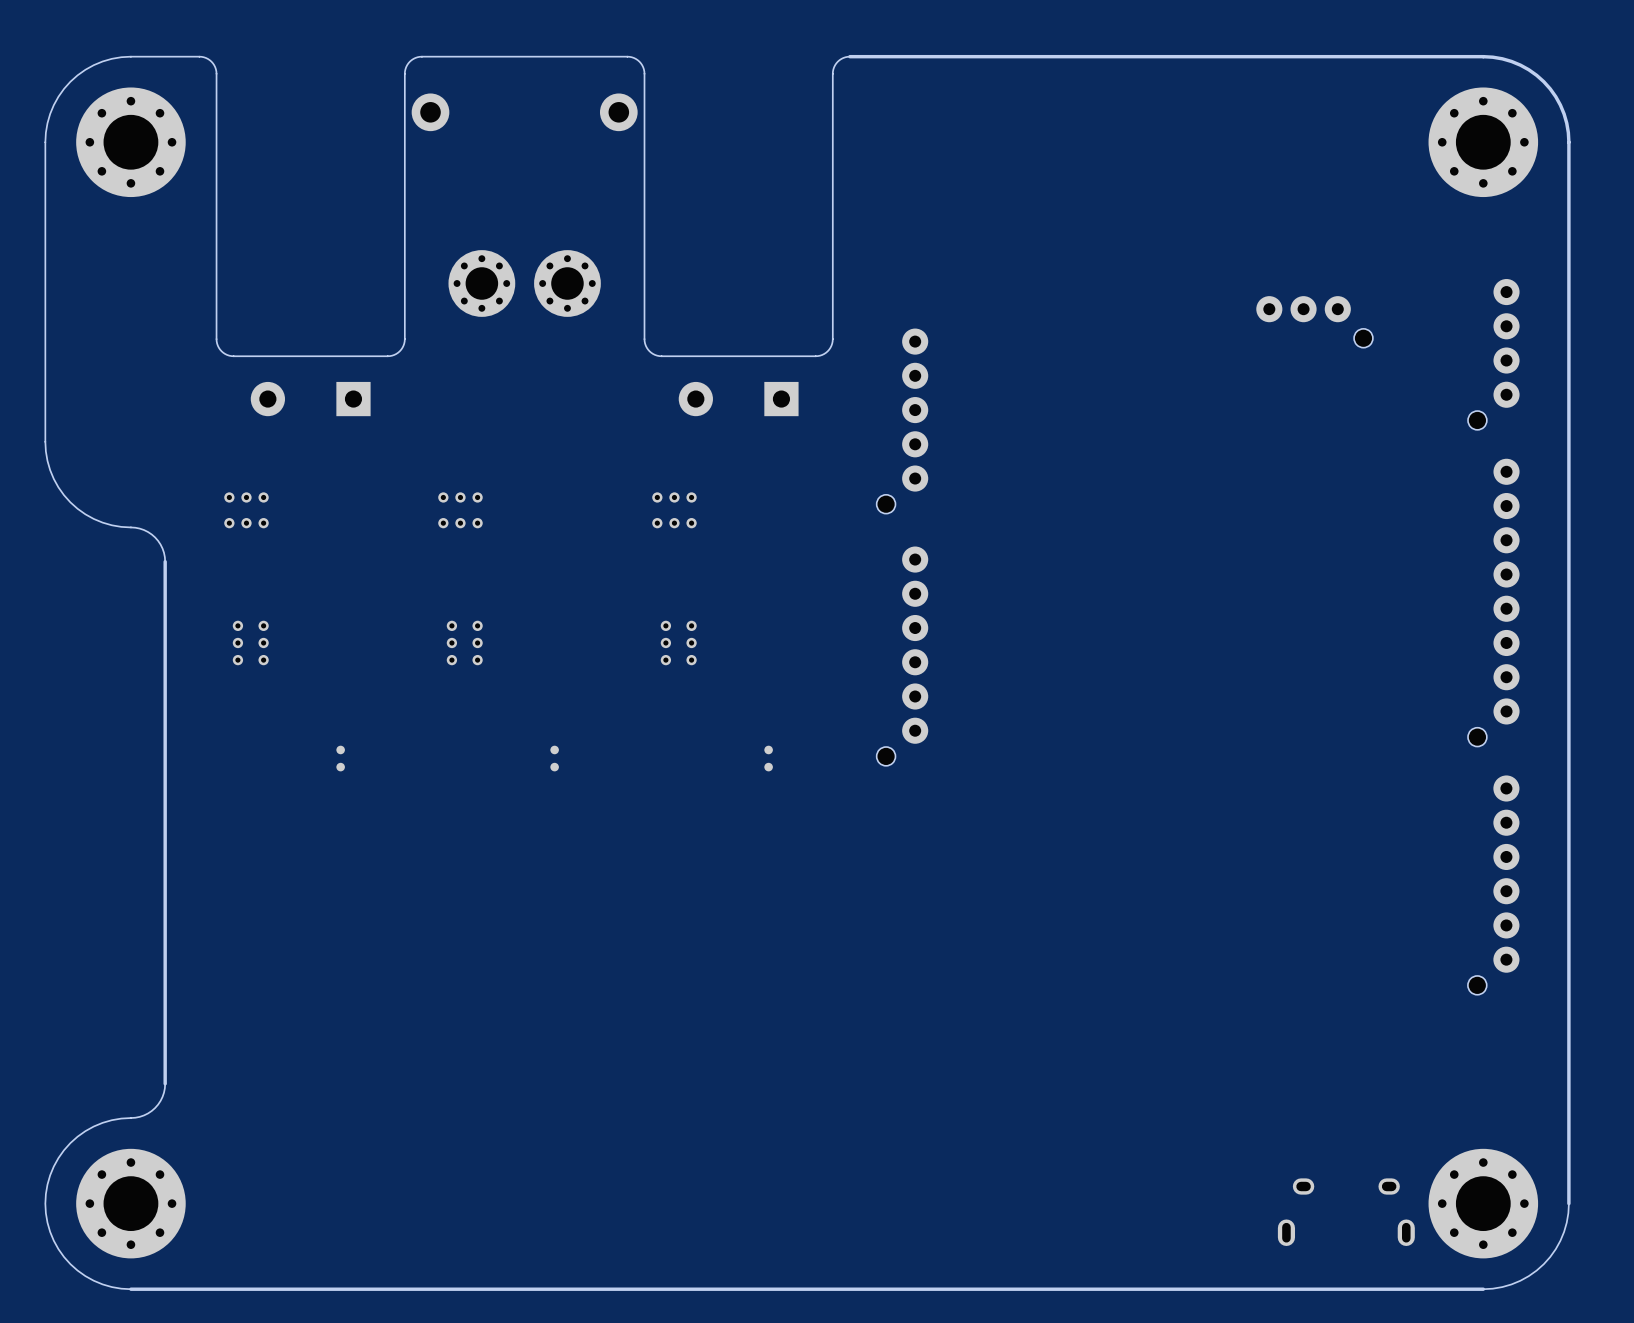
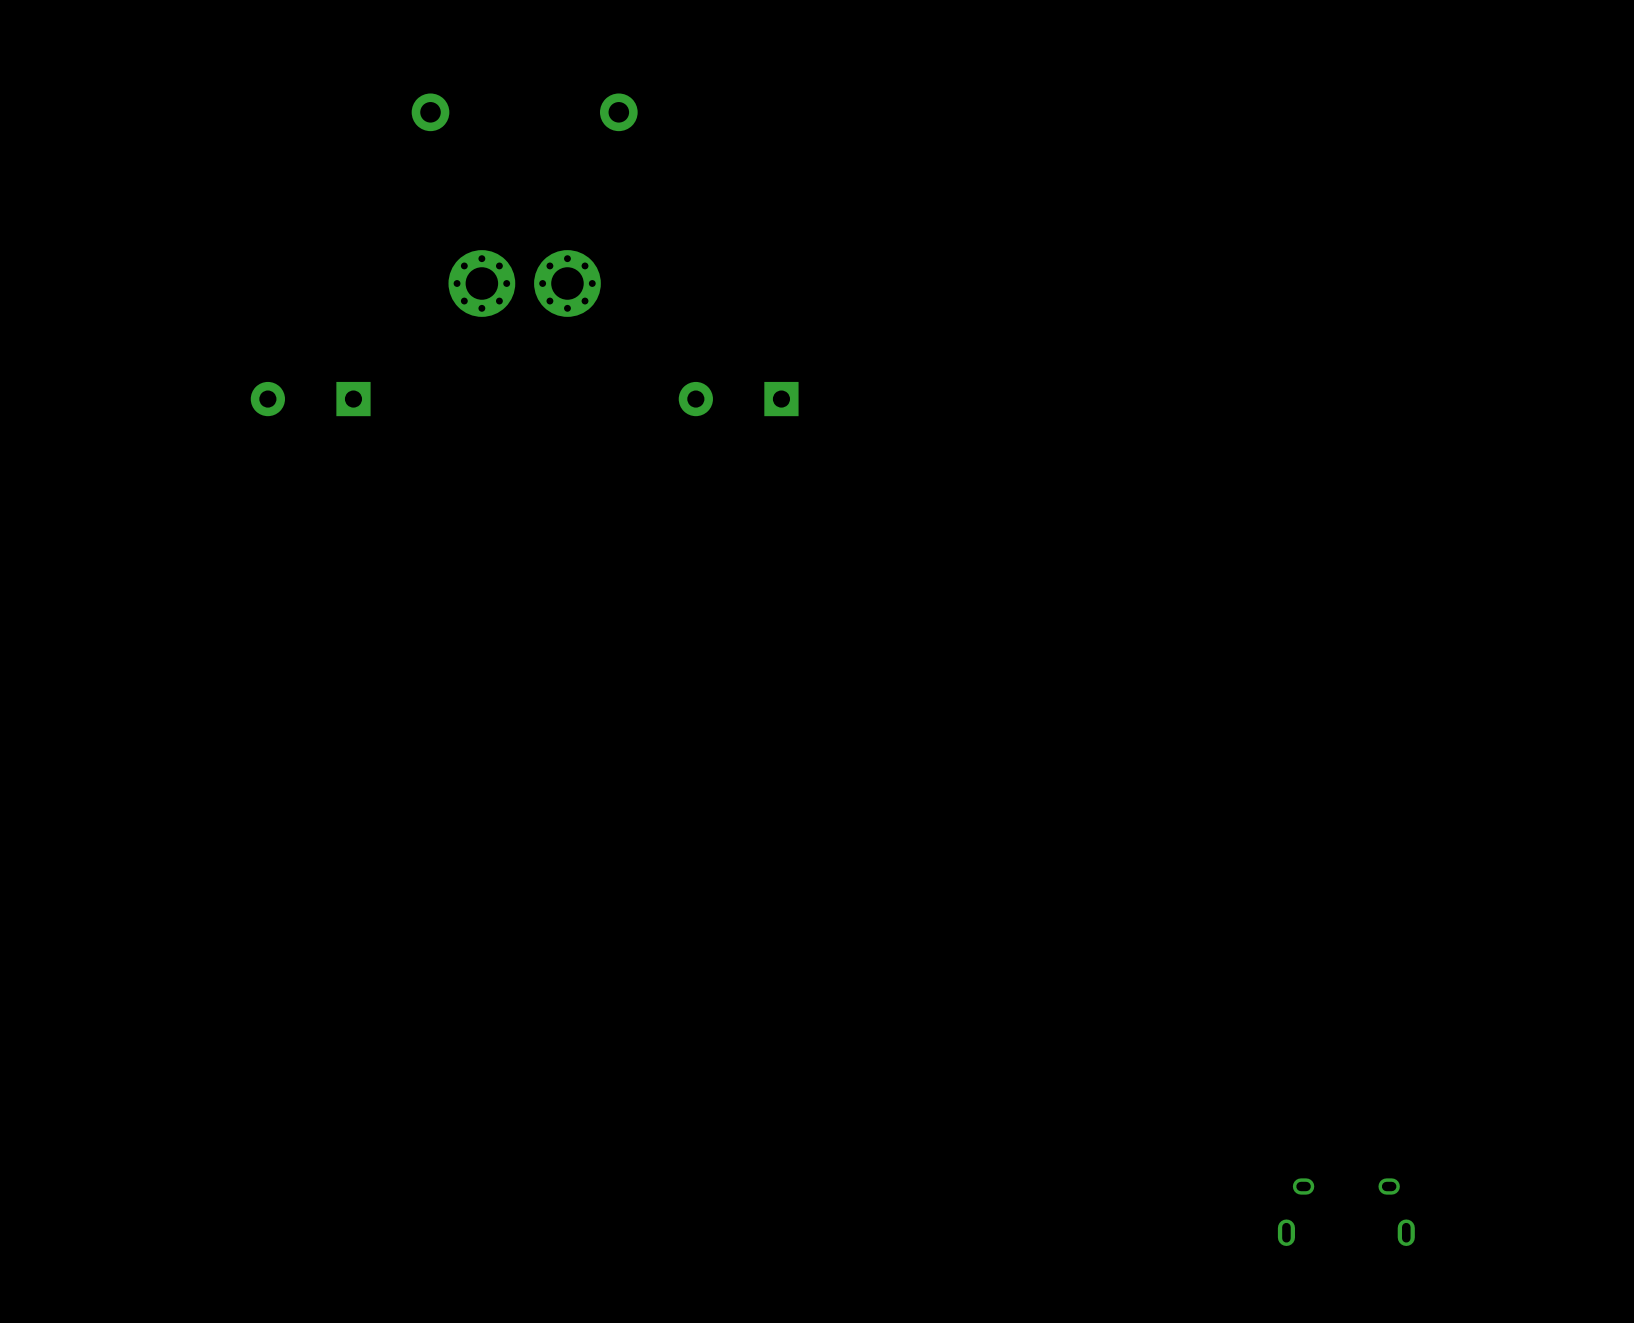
board edge: (1483, 56) (843, 57) (836, 63) (832, 73) (832, 341) (827, 351) (815, 356) (661, 356) (653, 353) (646, 347) (644, 339) (644, 73) (640, 63) (633, 57) (421, 56) (415, 57) (408, 63) (404, 73) (404, 341) (399, 351) (387, 356) (233, 356) (221, 351) (216, 339) (216, 73) (214, 65) (209, 60) (201, 56) (121, 57) (102, 61) (77, 75) (64, 88) (53, 105) (45, 132) (45, 451) (53, 478) (64, 495) (77, 508) (102, 522) (139, 528) (148, 532) (158, 540) (164, 557) (165, 1083) (162, 1096) (151, 1110) (139, 1116) (111, 1120) (93, 1126) (70, 1143) (58, 1158) (47, 1184) (45, 1213) (50, 1231) (64, 1256) (77, 1270) (93, 1280) (111, 1287) (130, 1289) (1483, 1289) (1511, 1284) (1536, 1270) (1550, 1256) (1560, 1240) (1566, 1222) (1568, 1203) (1568, 142) (1564, 113) (1555, 96) (1543, 81) (1528, 69) (1511, 61) (1483, 56) -> none
part: (130, 142) -> none
part: (1483, 142) -> none
part: (1314, 321) -> none
part: (1493, 354) -> none
part: (902, 421) -> none
part: (246, 510) -> none
part: (460, 510) -> none
part: (674, 510) -> none
part: (1493, 602) -> none
part: (250, 642) -> none
part: (464, 642) -> none
part: (678, 642) -> none
part: (902, 656) -> none
part: (340, 758) -> none
part: (554, 758) -> none
part: (768, 758) -> none
part: (1493, 885) -> none
part: (130, 1203) -> none
part: (1483, 1203) -> none

